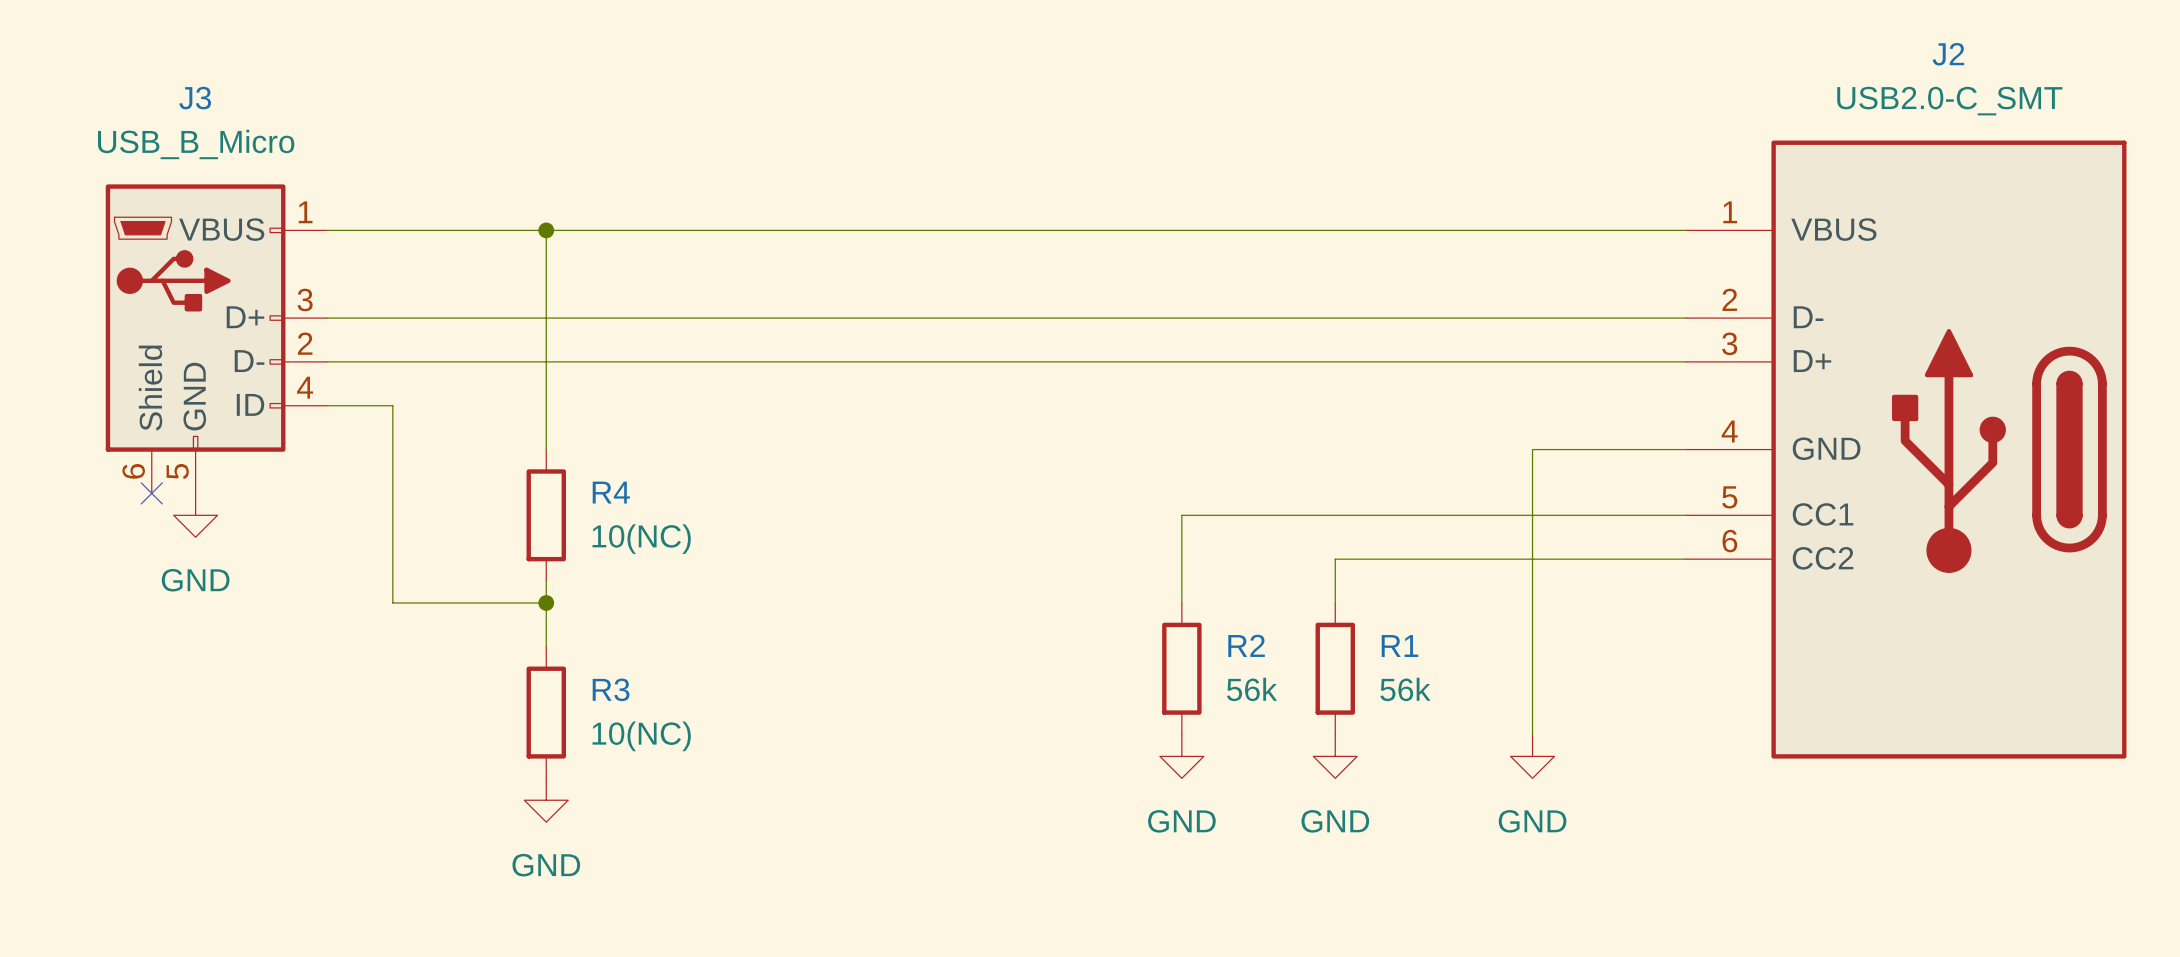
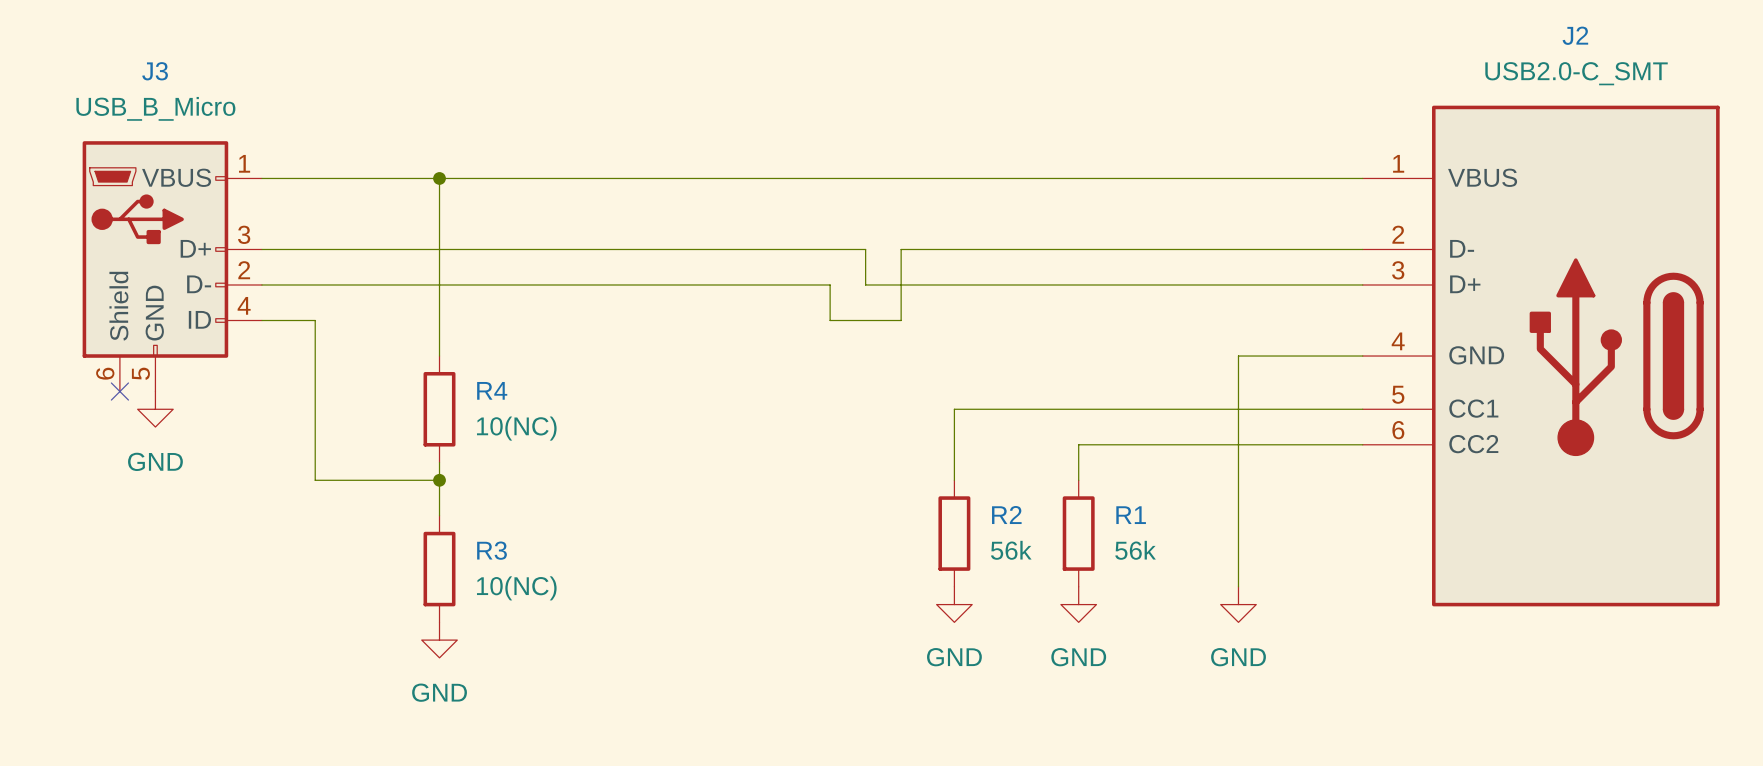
wire: (1072, 318) (1116, 318) -> (865, 249) (865, 284)
wire: (1028, 361) (1072, 361) -> (830, 284) (830, 320) (901, 320) (901, 249)

